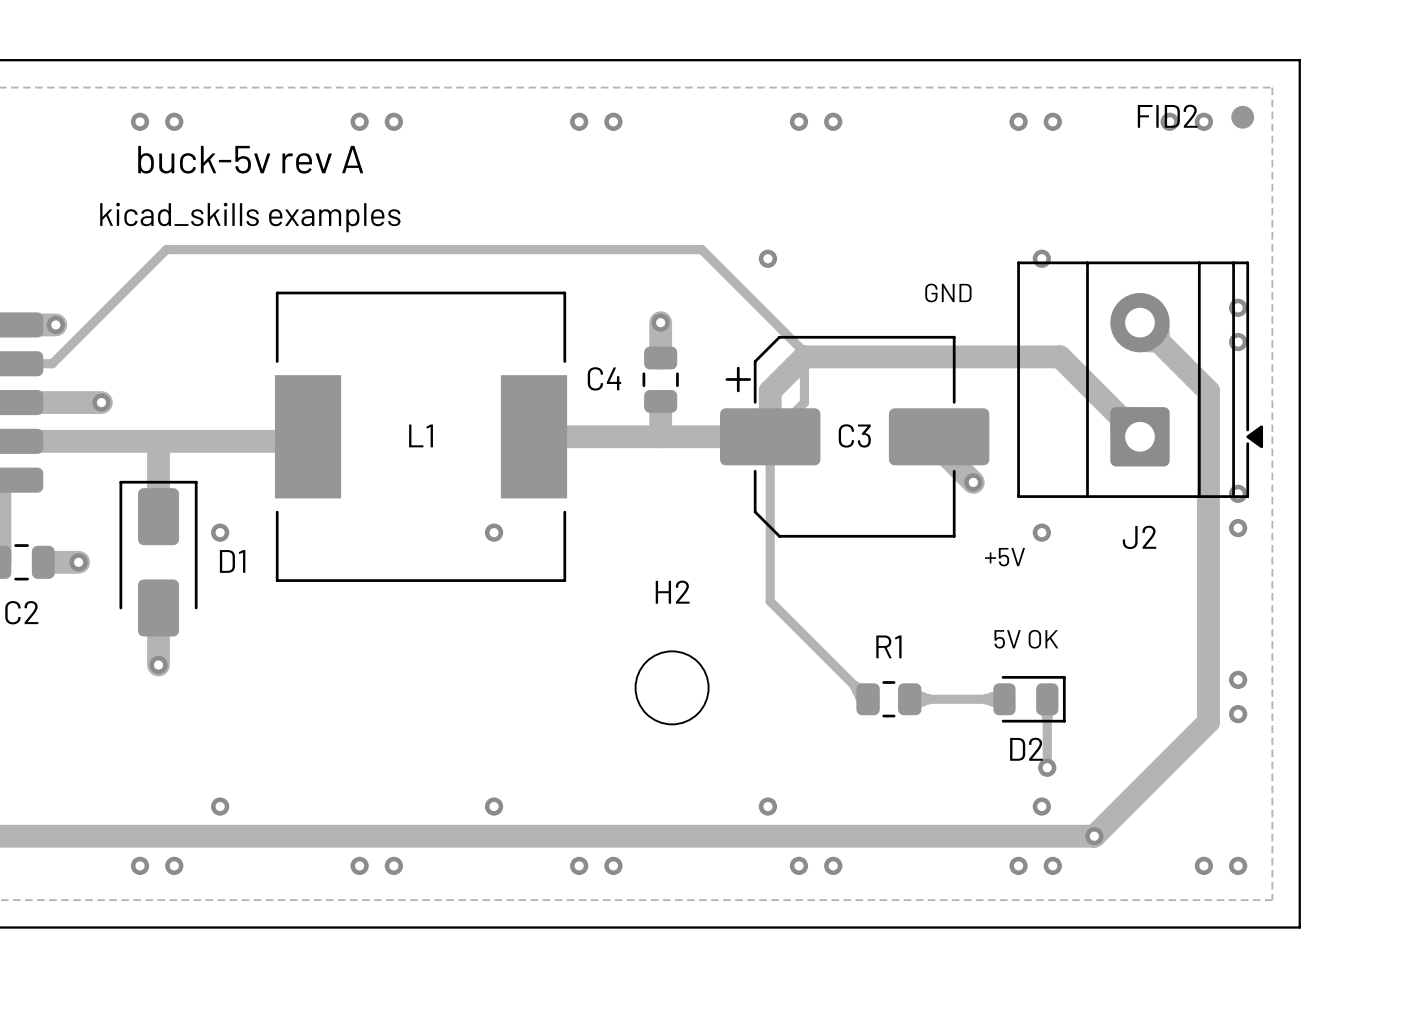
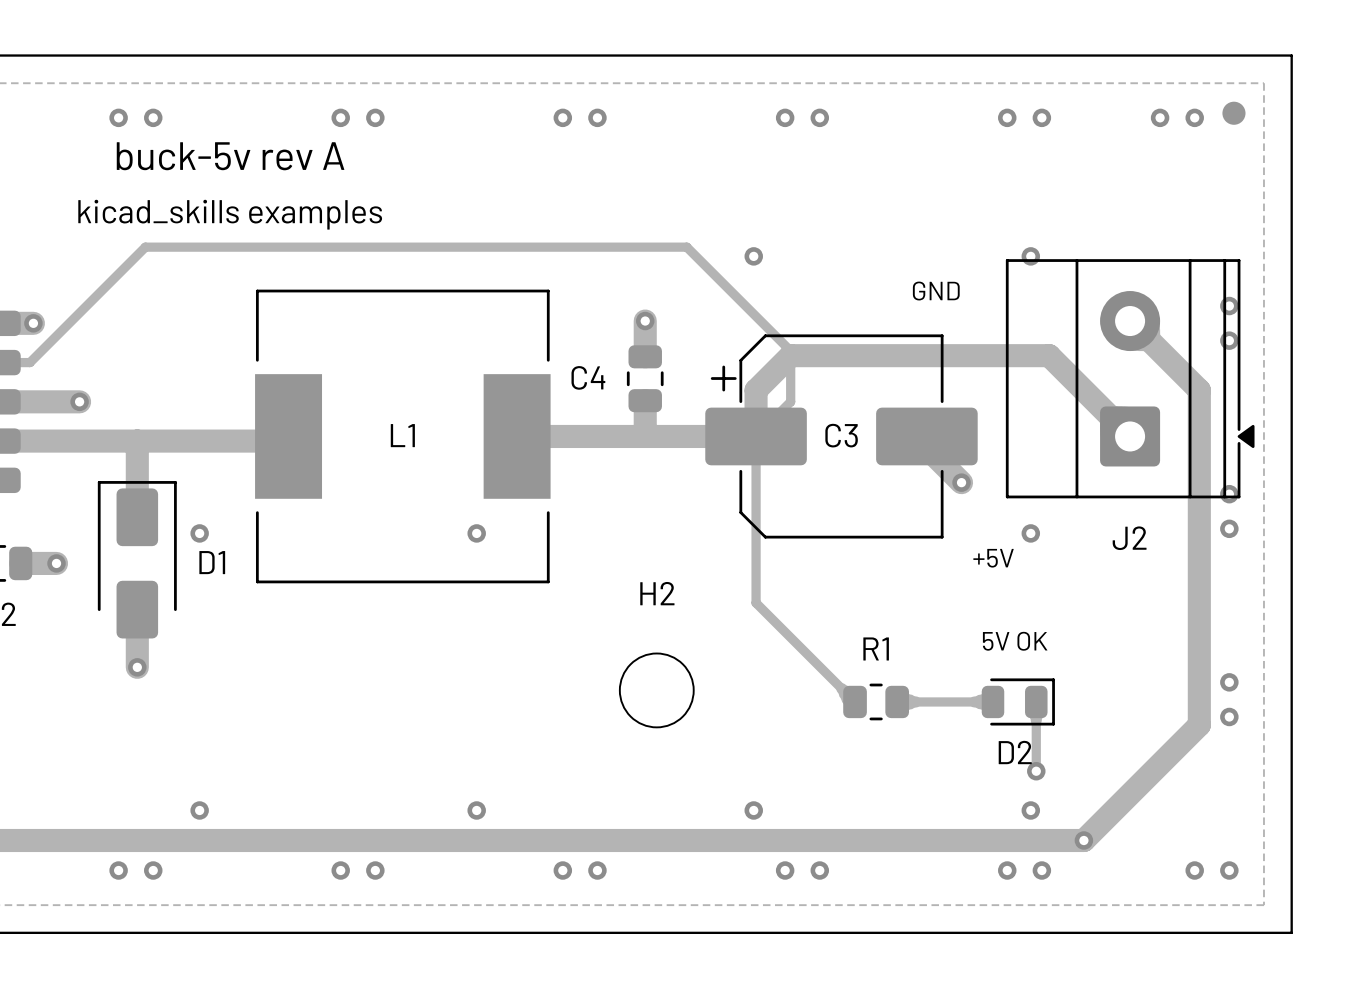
FID2 name: FID2 (1167, 116) -> none

